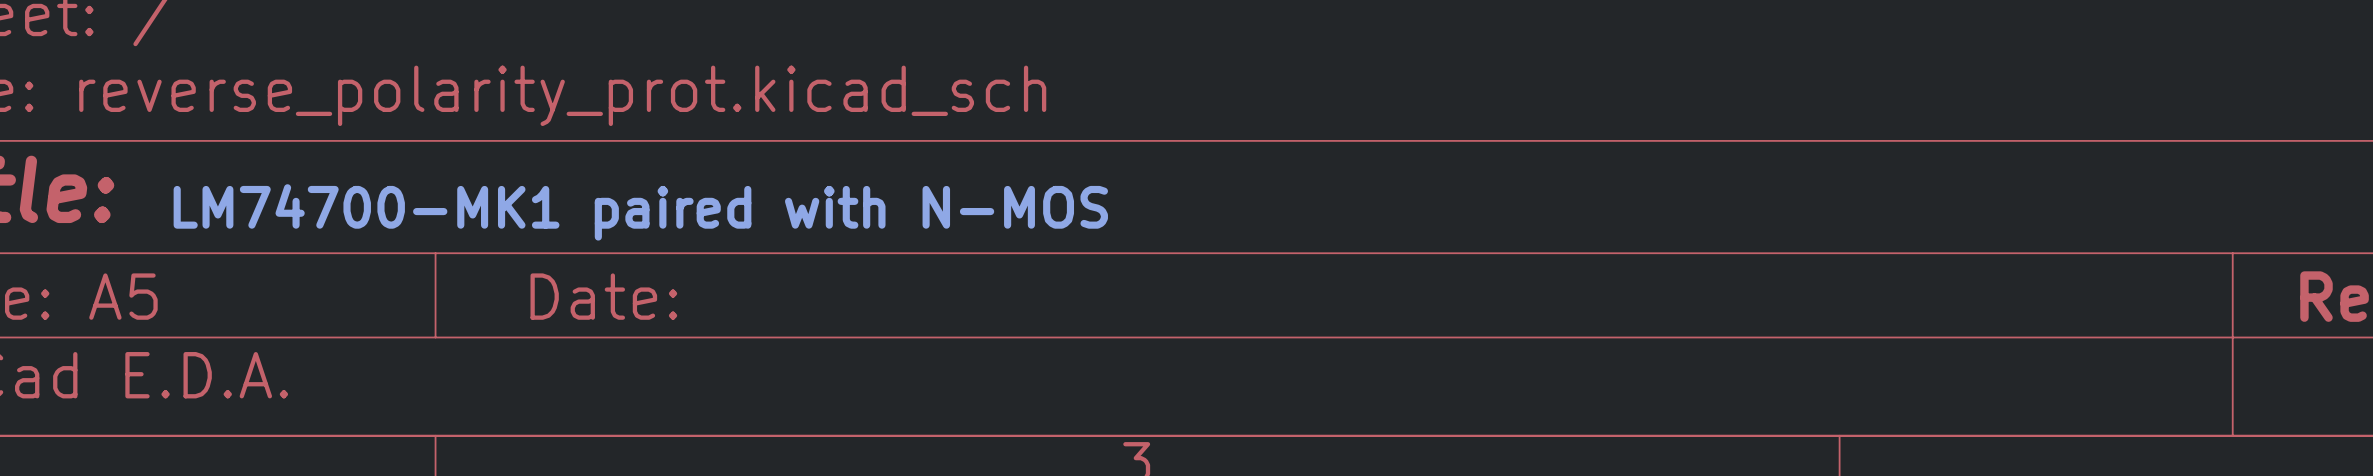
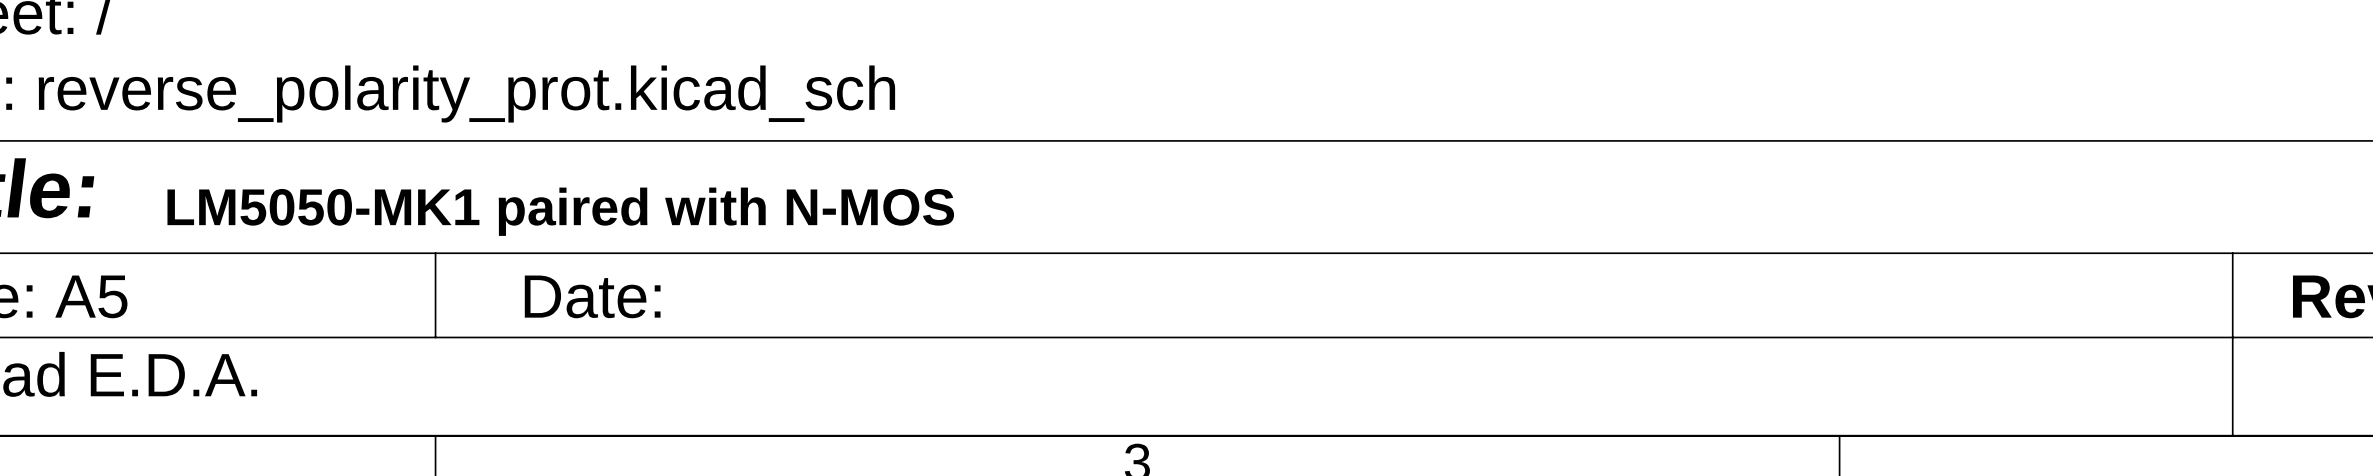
text: LM74700-MK1 paired with N-MOS (640, 212) -> LM5050-MK1 paired with N-MOS (560, 211)

